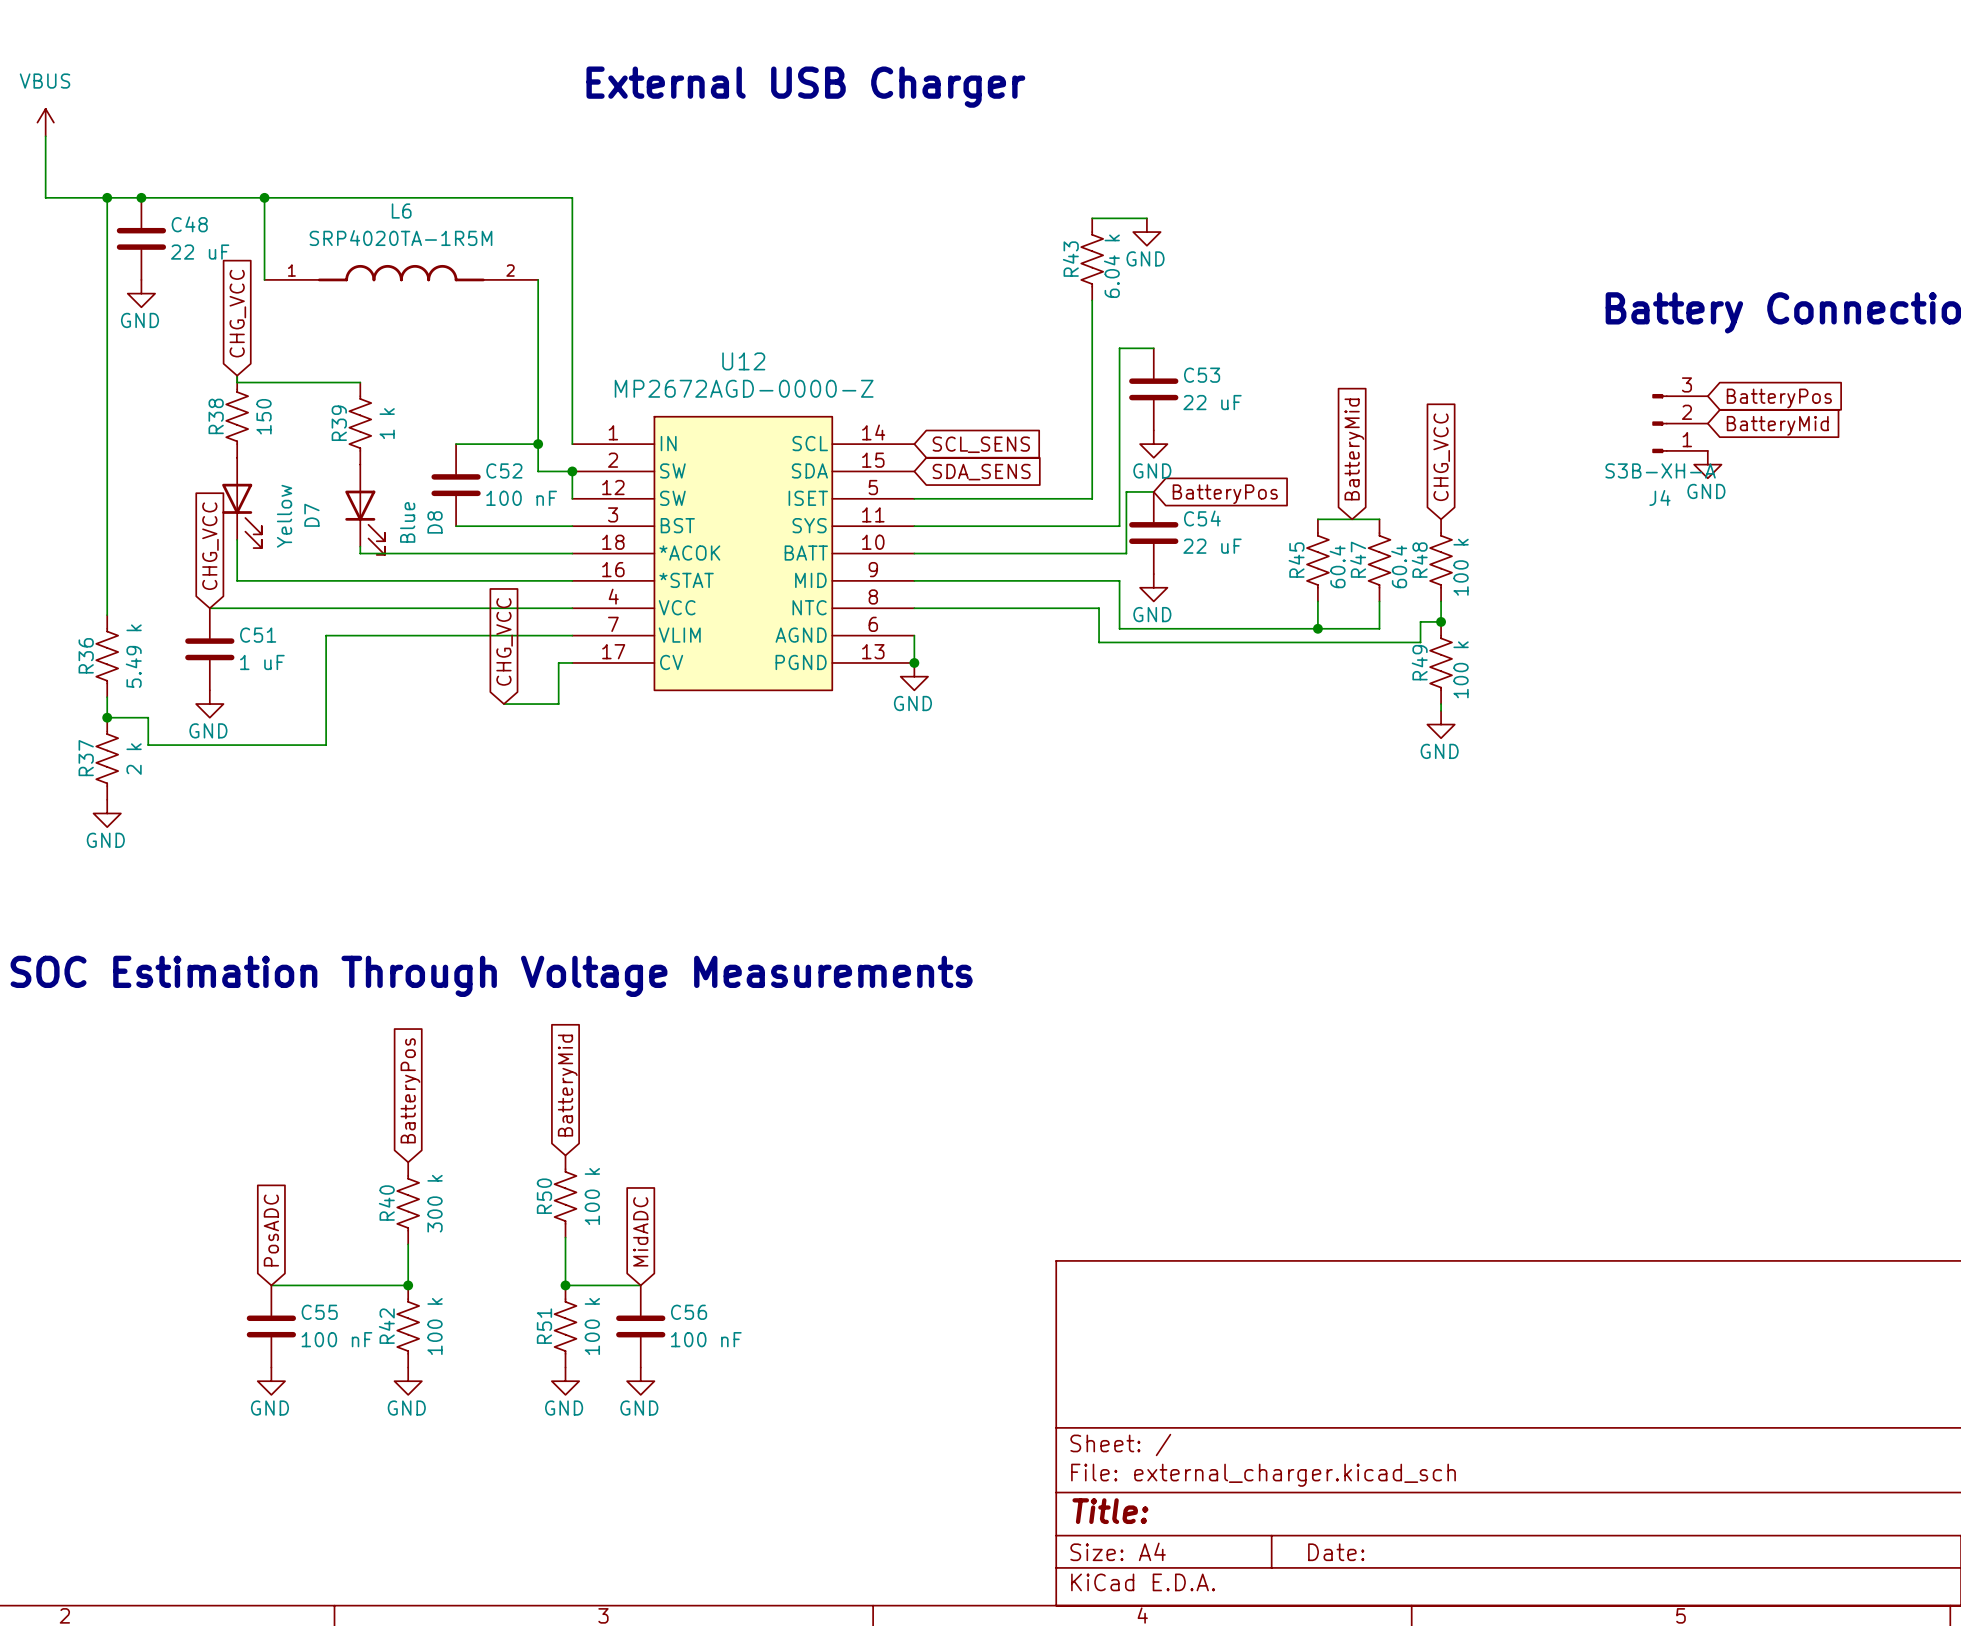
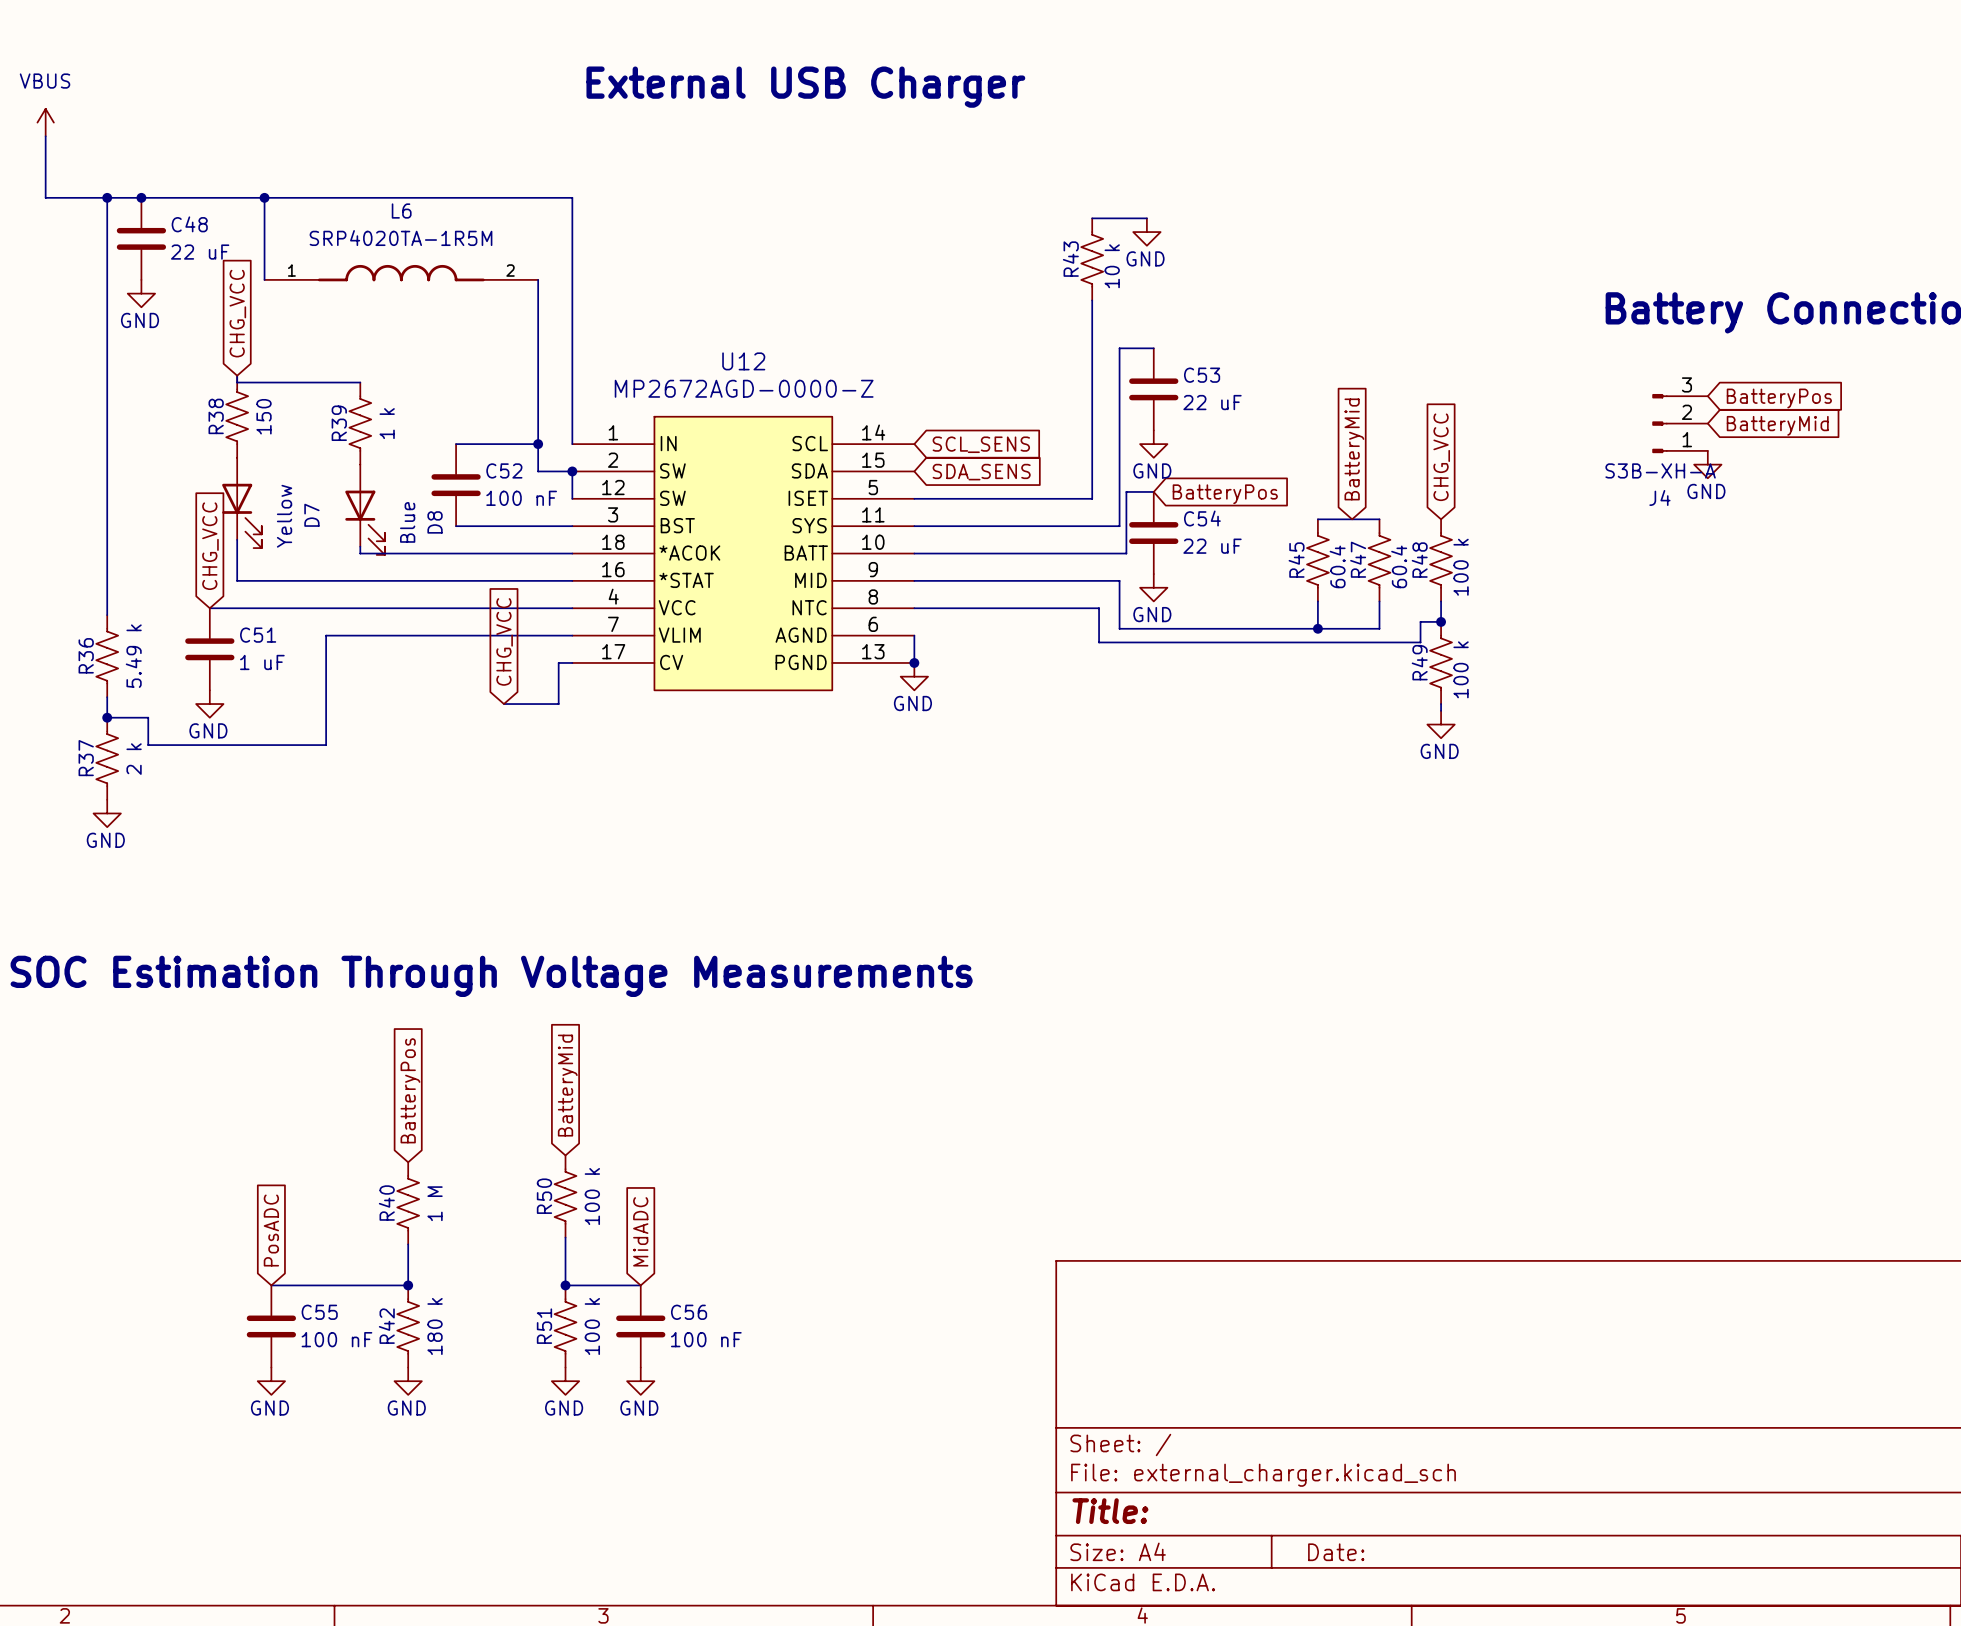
R43 value: 6.04 k (1111, 266) -> 10 k (1112, 266)
R40 value: 300 k (435, 1203) -> 1 M (435, 1203)
R42 value: 100 k (435, 1326) -> 180 k (435, 1326)

